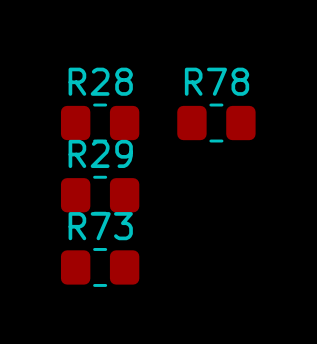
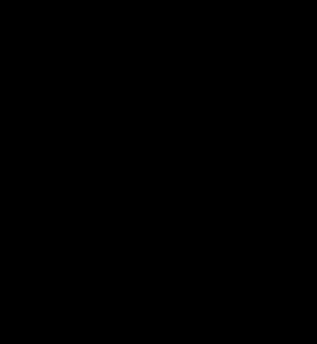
R28: (100, 123) -> none
R78: (216, 123) -> none
R29: (100, 195) -> none
R73: (100, 267) -> none

